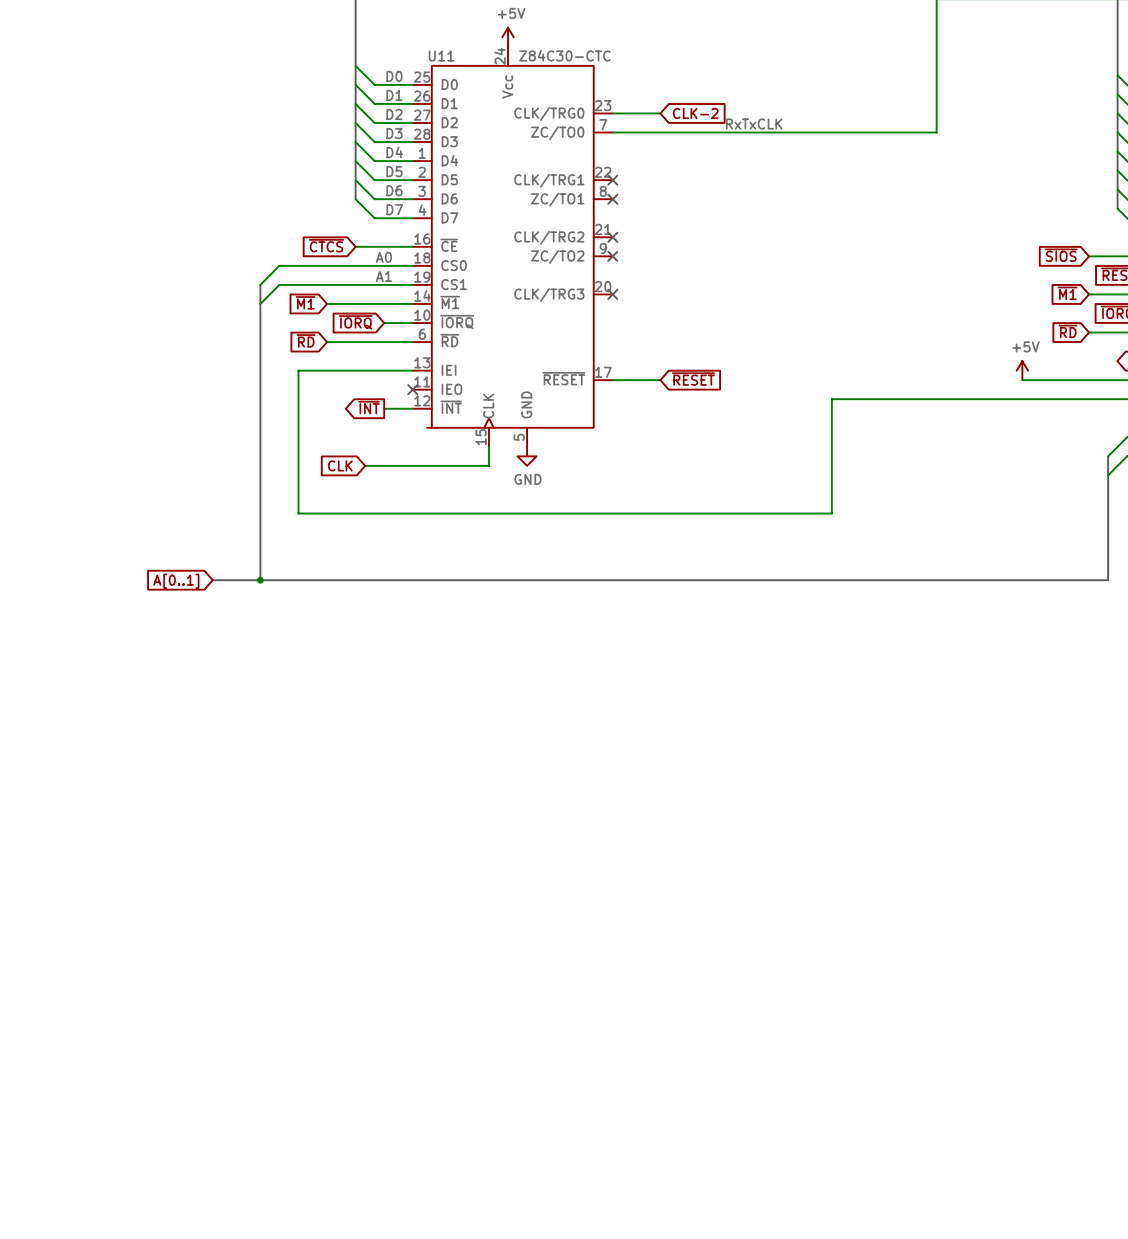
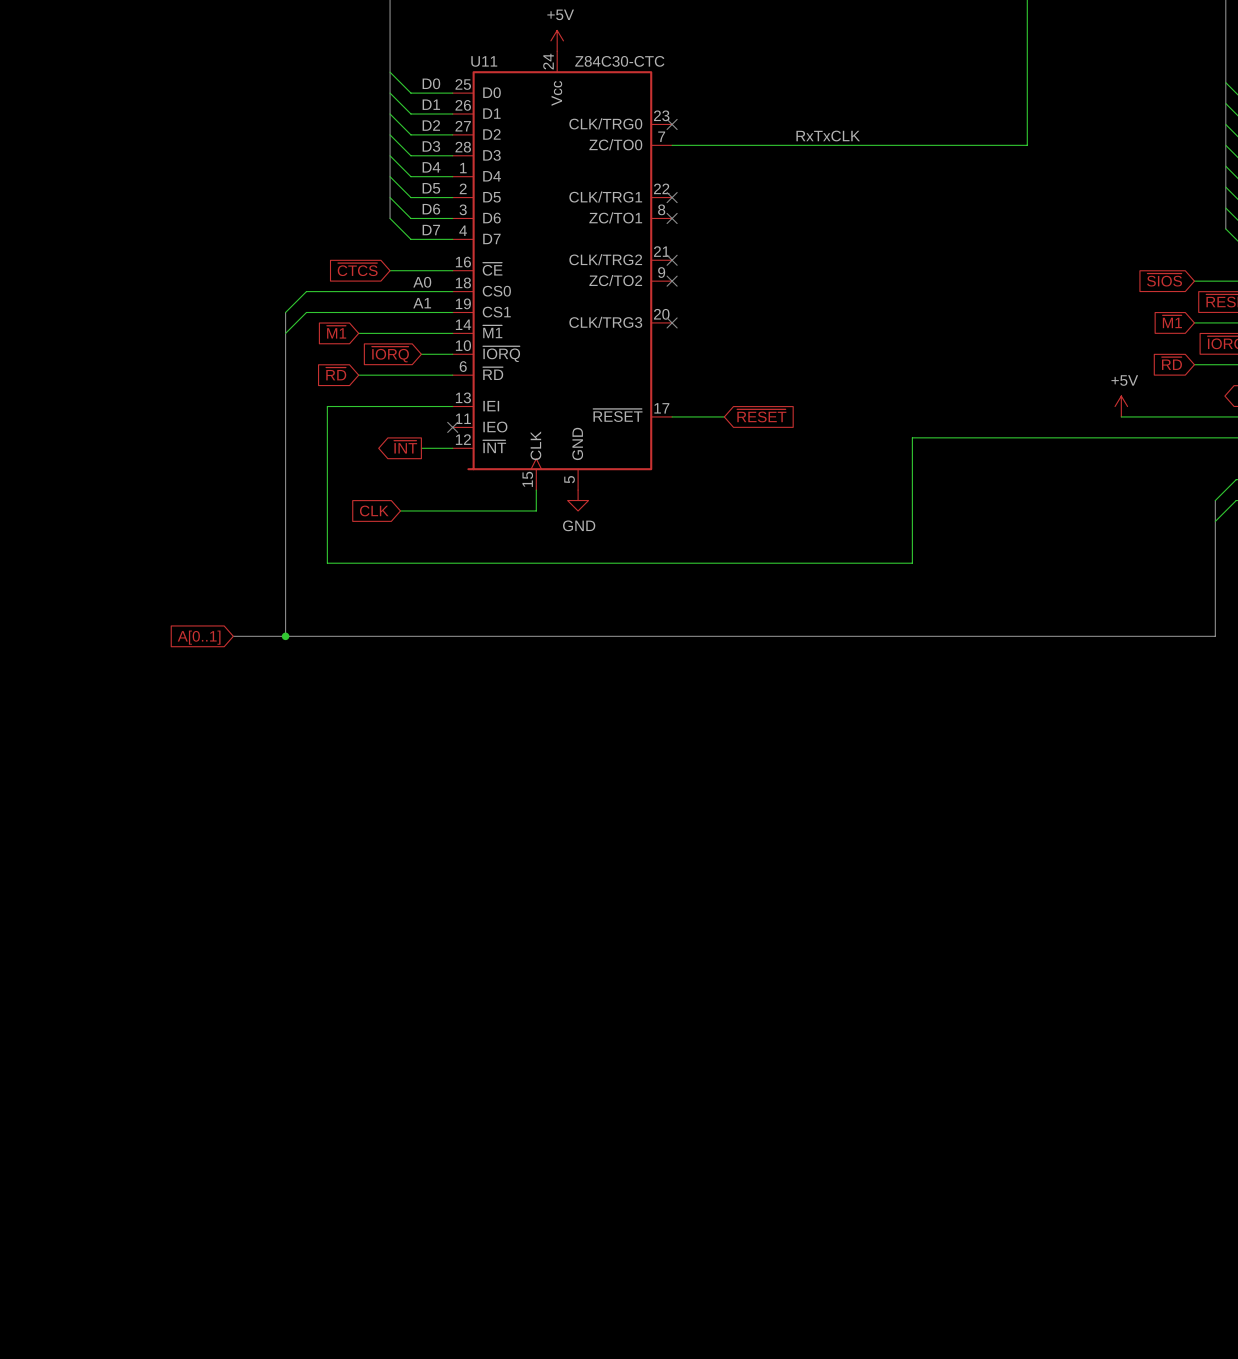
wire: (612, 113) (660, 113) -> none
no-connect mark: none -> (672, 124)
global label: CLK-2 (695, 113) -> none

